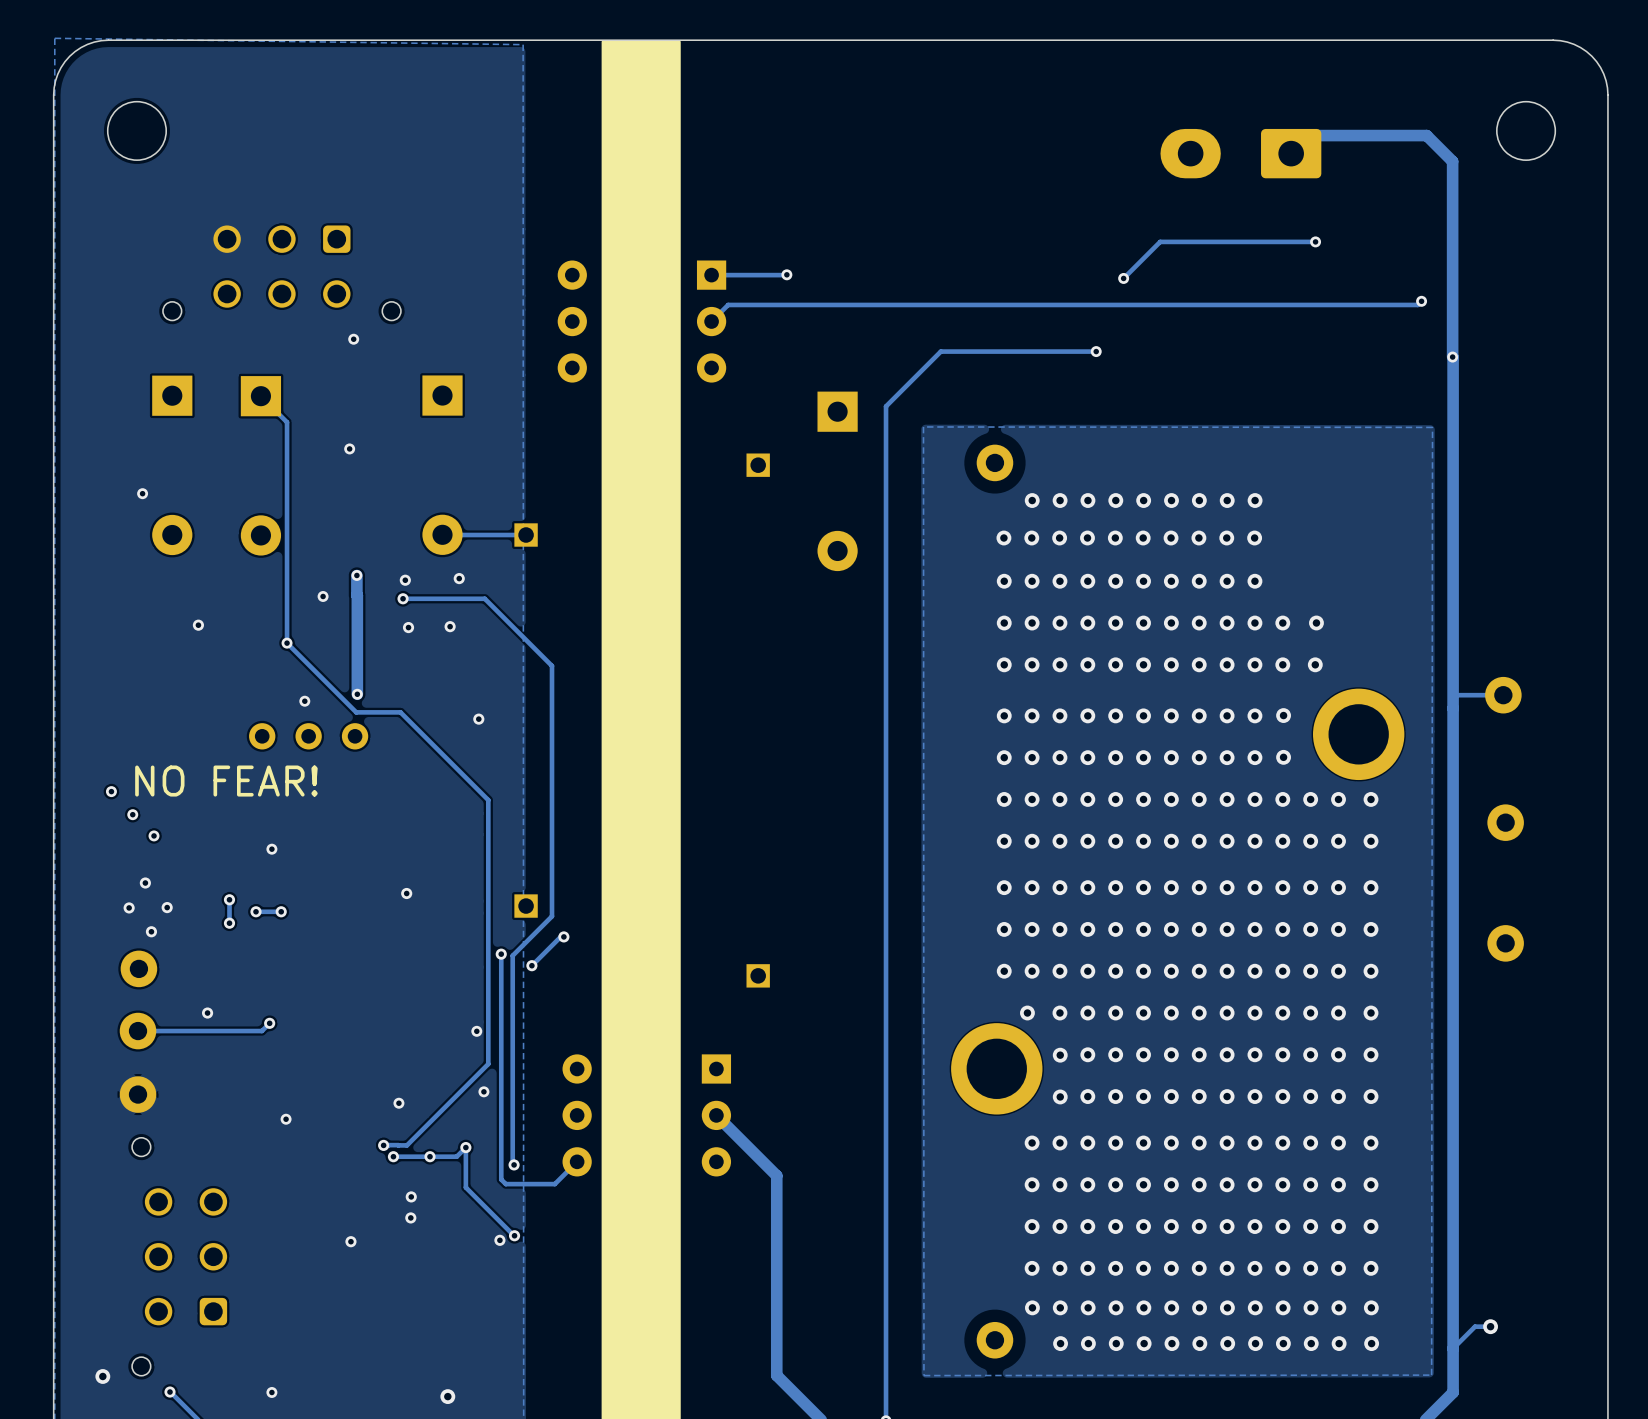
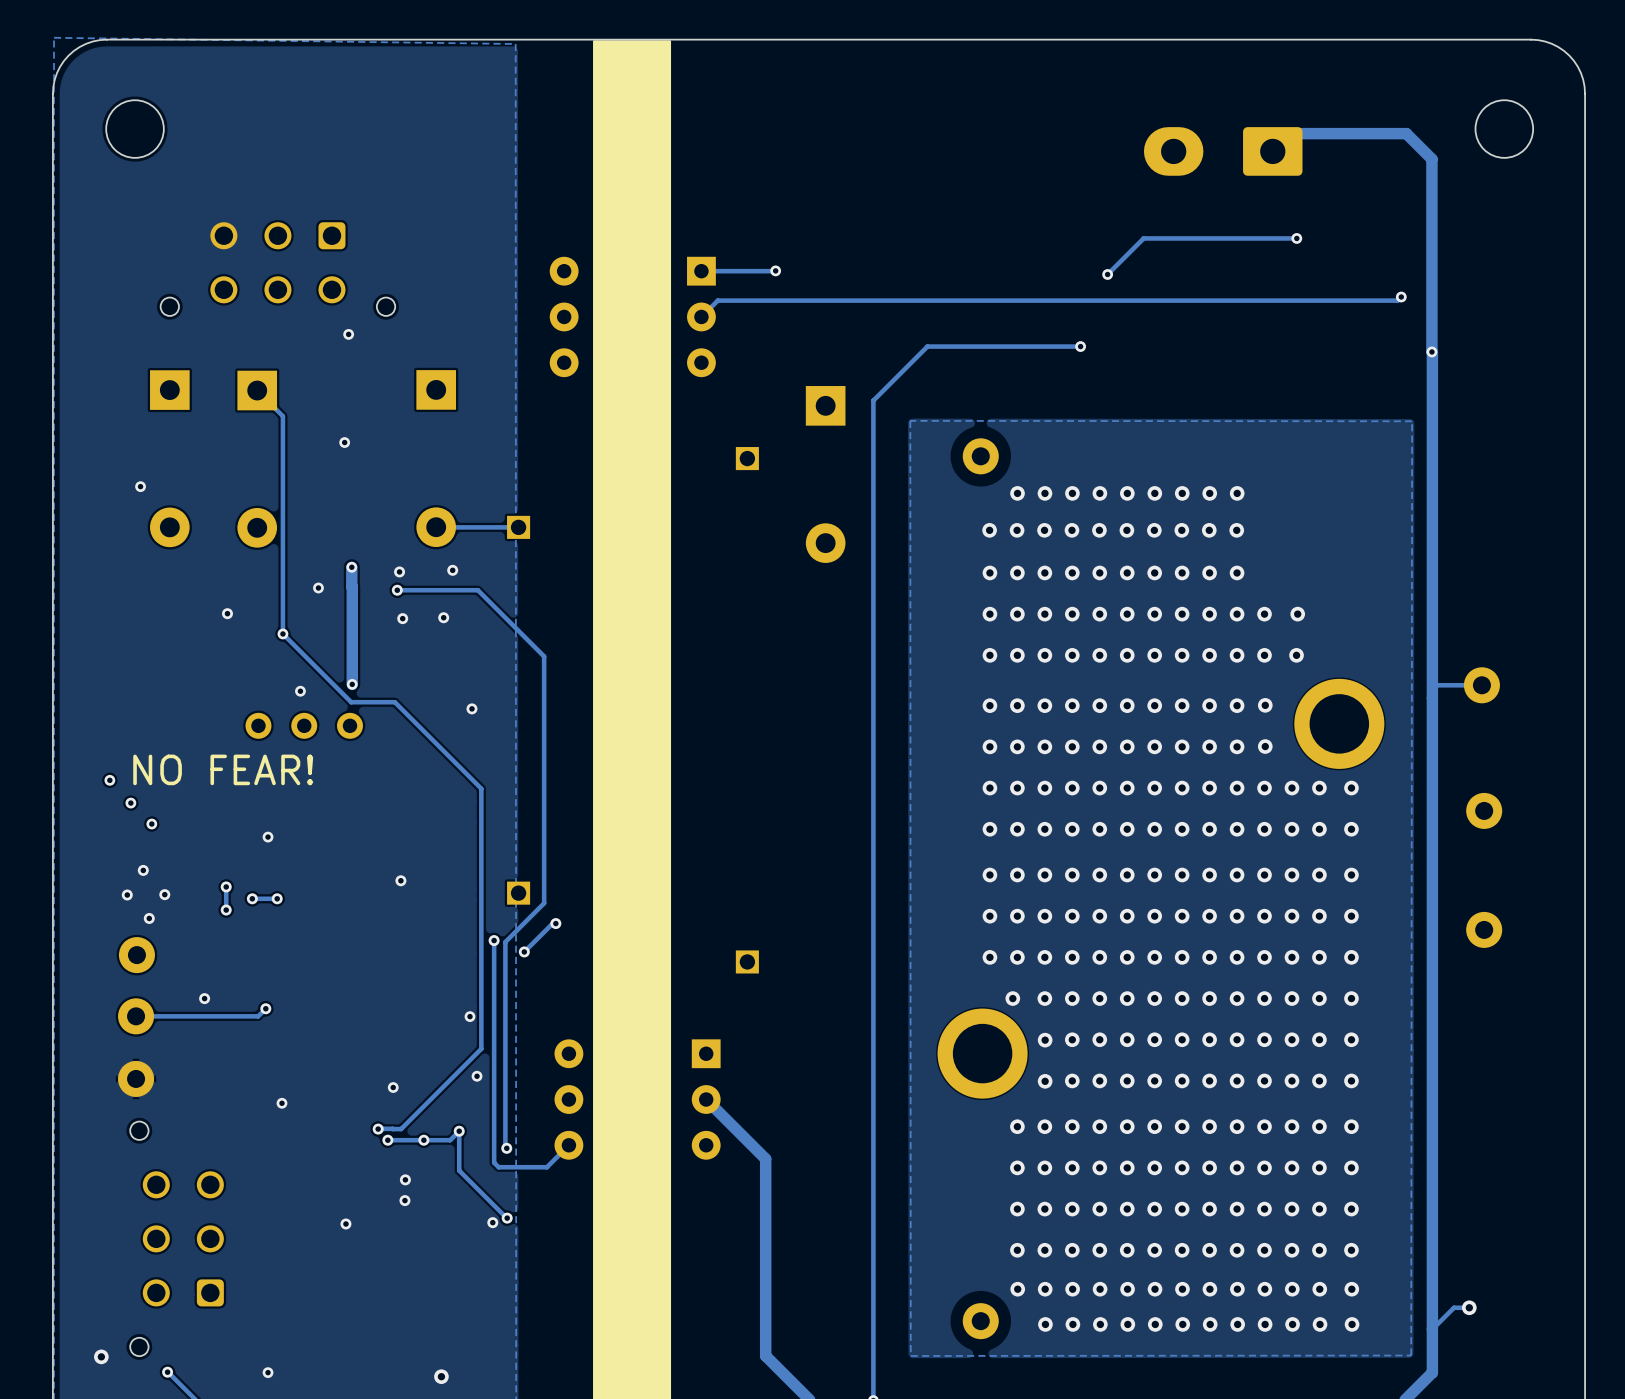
via position: (198, 625) -> (227, 613)

